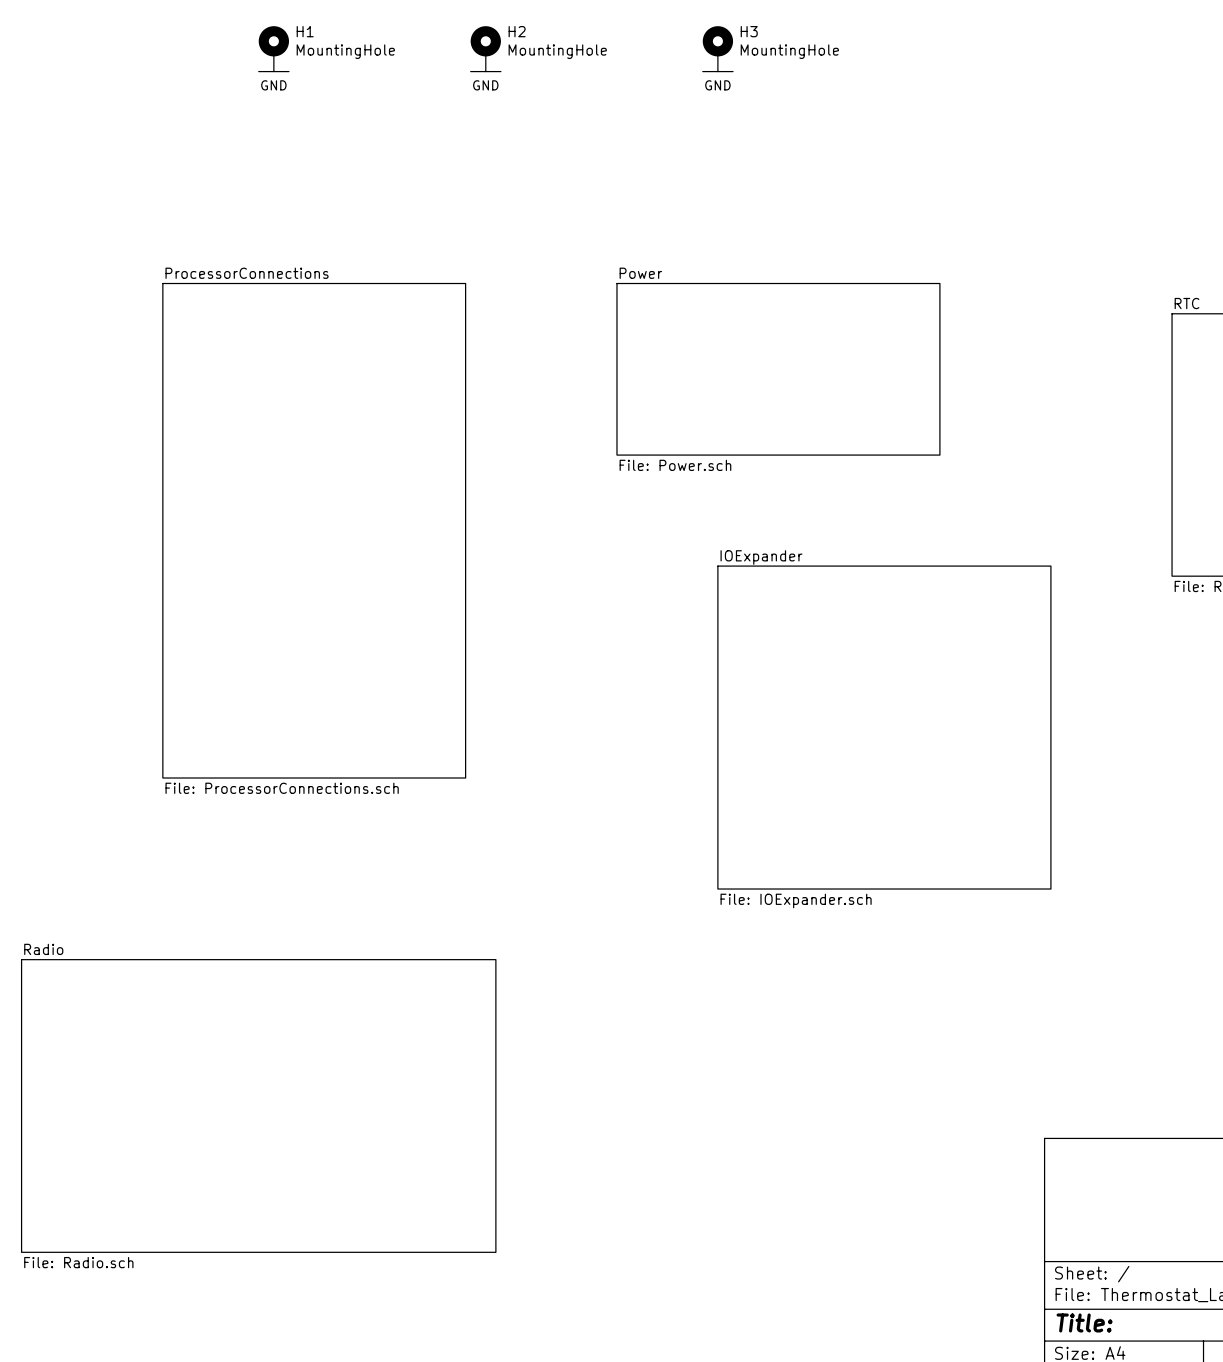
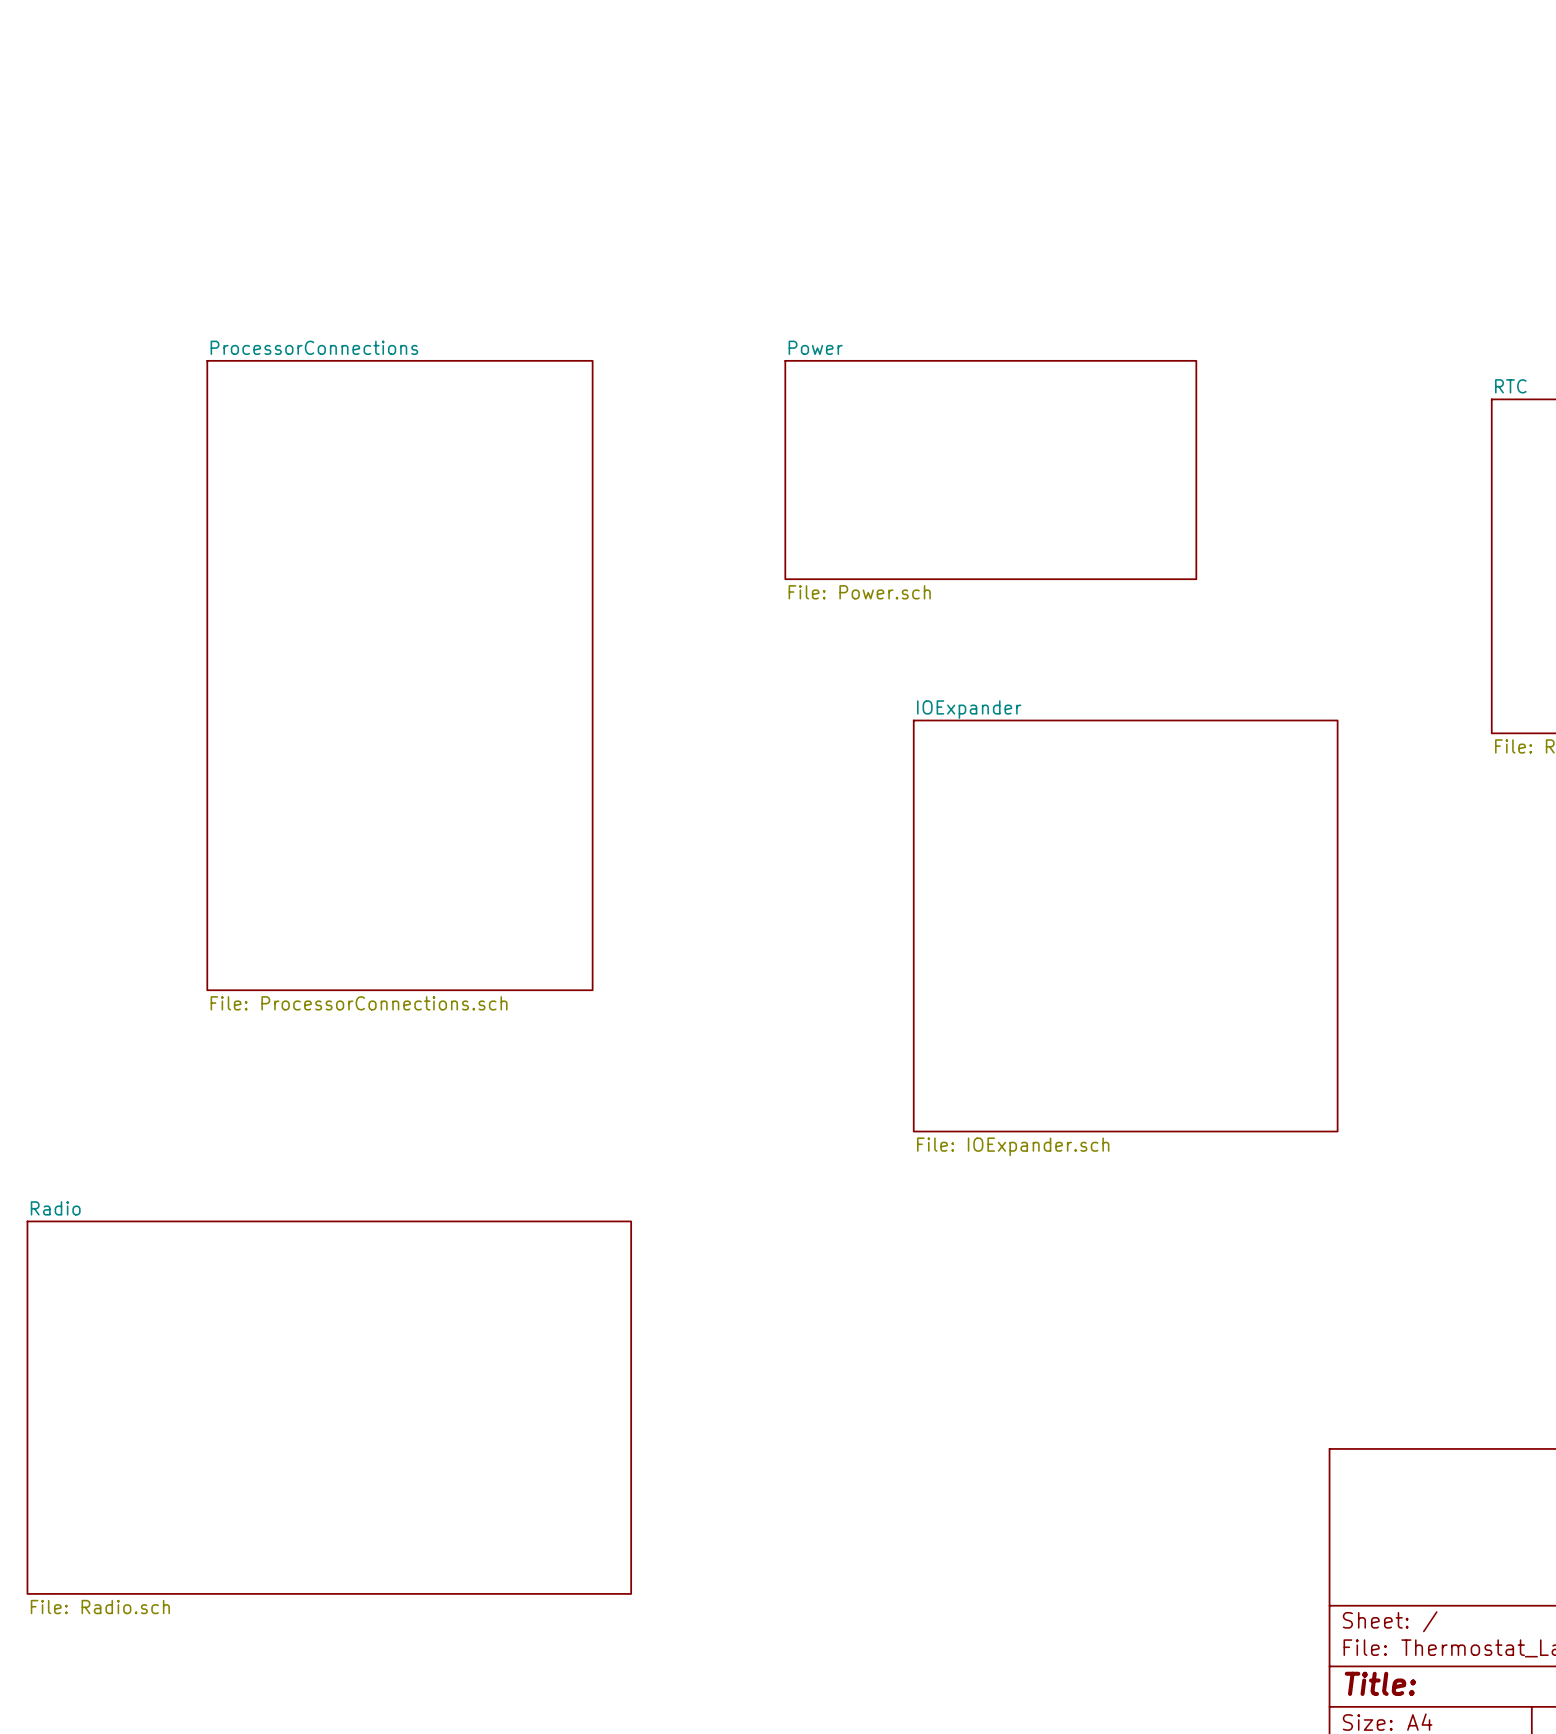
H1: MountingHole (273, 41) -> none
H2: MountingHole (485, 41) -> none
H3: MountingHole (717, 41) -> none
power symbol: GND (273, 61) -> none
power symbol: GND (485, 61) -> none
power symbol: GND (717, 61) -> none

